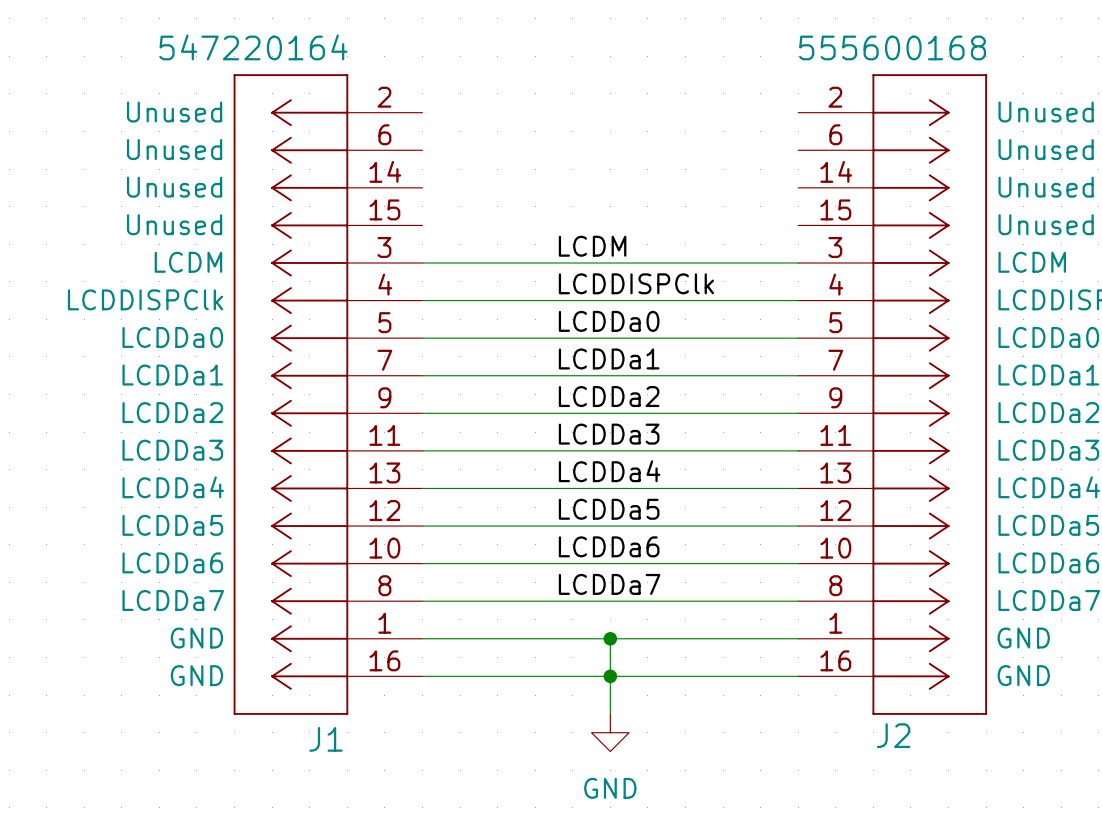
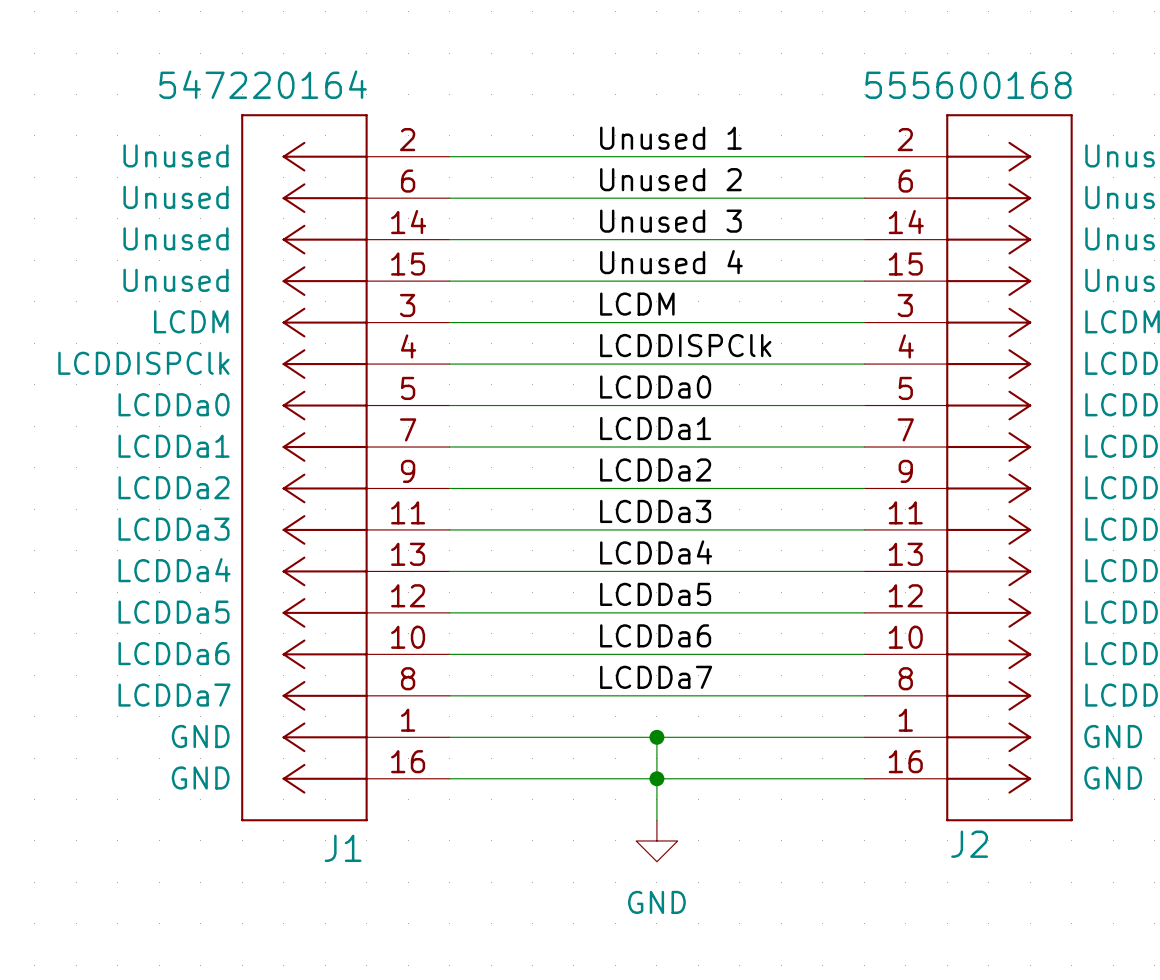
label: none -> Unused 1 (670, 138)
wire: none -> (449, 156) (864, 156)
label: none -> Unused 2 (670, 179)
wire: none -> (449, 198) (864, 198)
label: none -> Unused 3 (670, 221)
wire: none -> (449, 239) (864, 239)
label: none -> Unused 4 (671, 262)
wire: none -> (449, 281) (864, 281)

